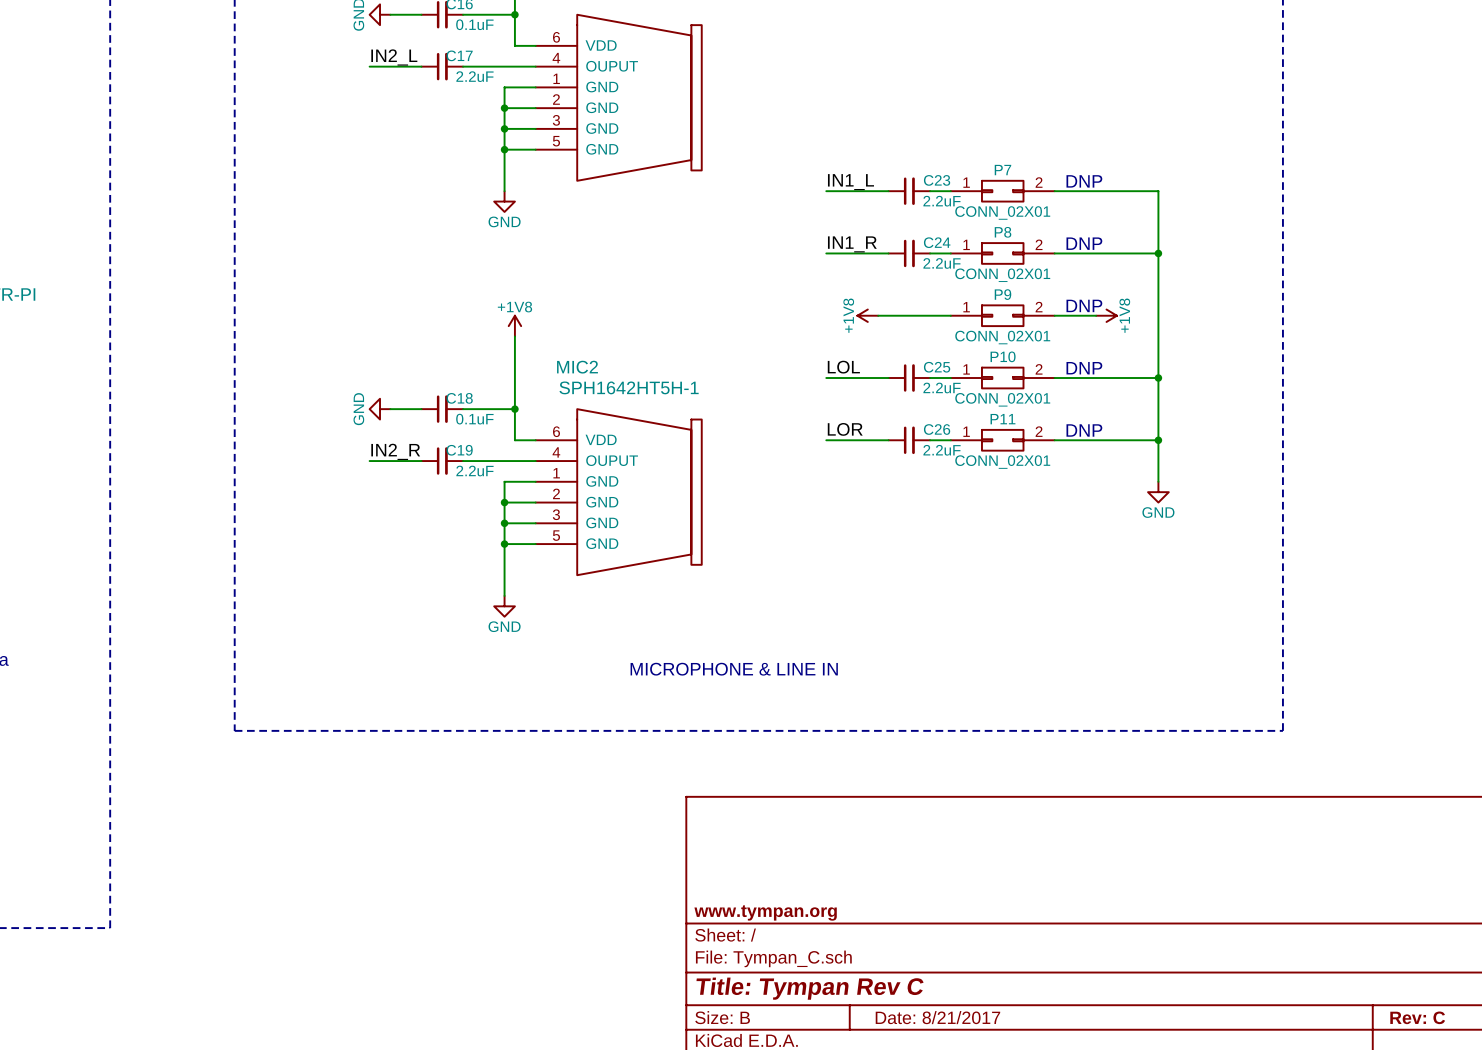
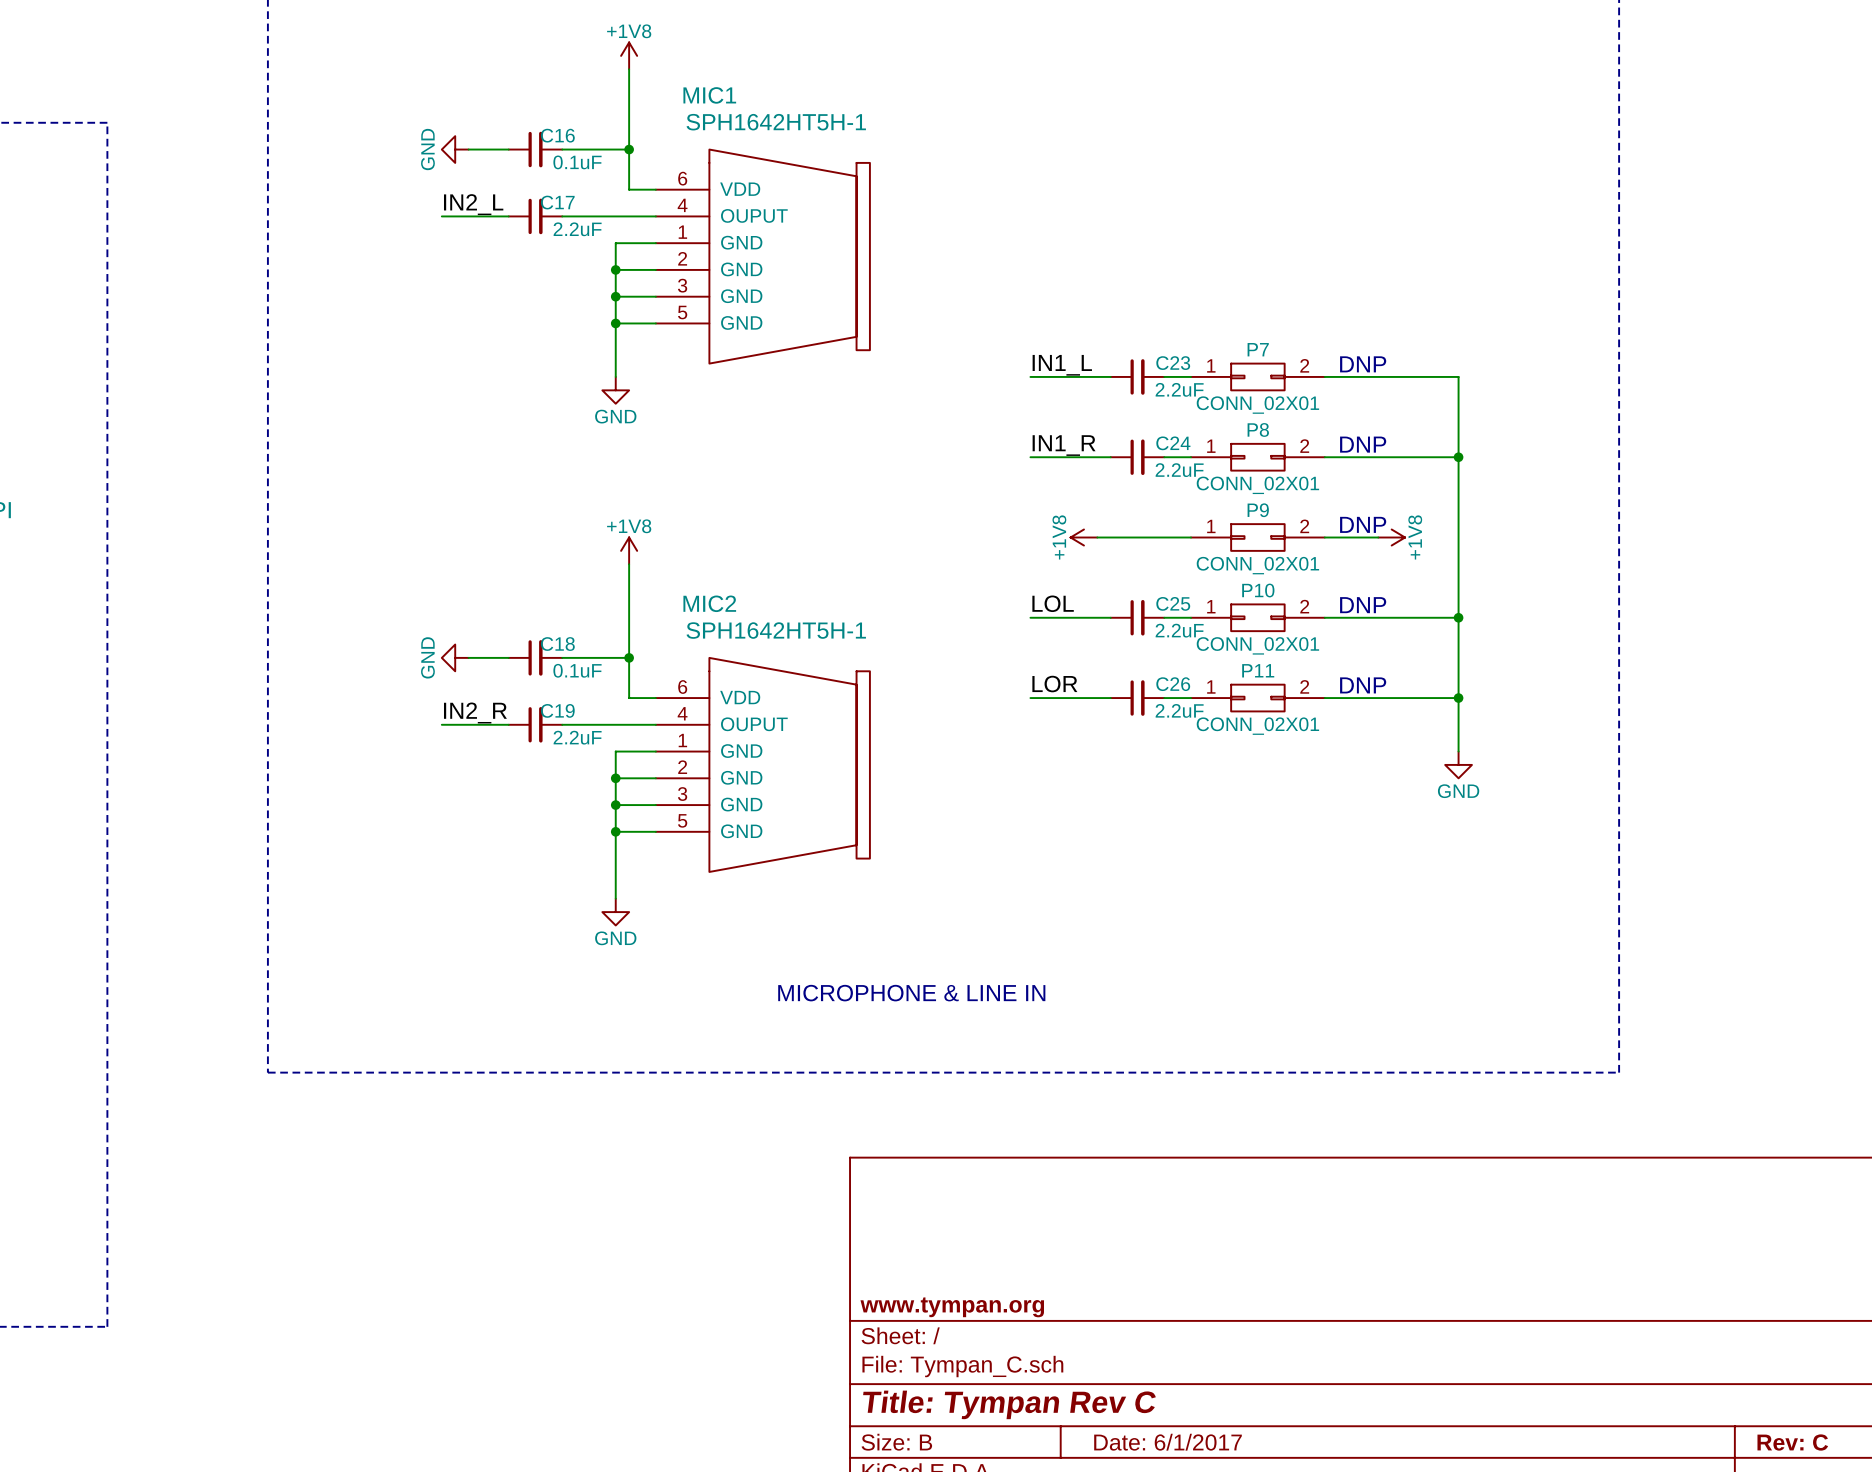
title block: Date: 8/21/2017 (937, 1017) -> Date: 6/1/2017 (1168, 1442)

